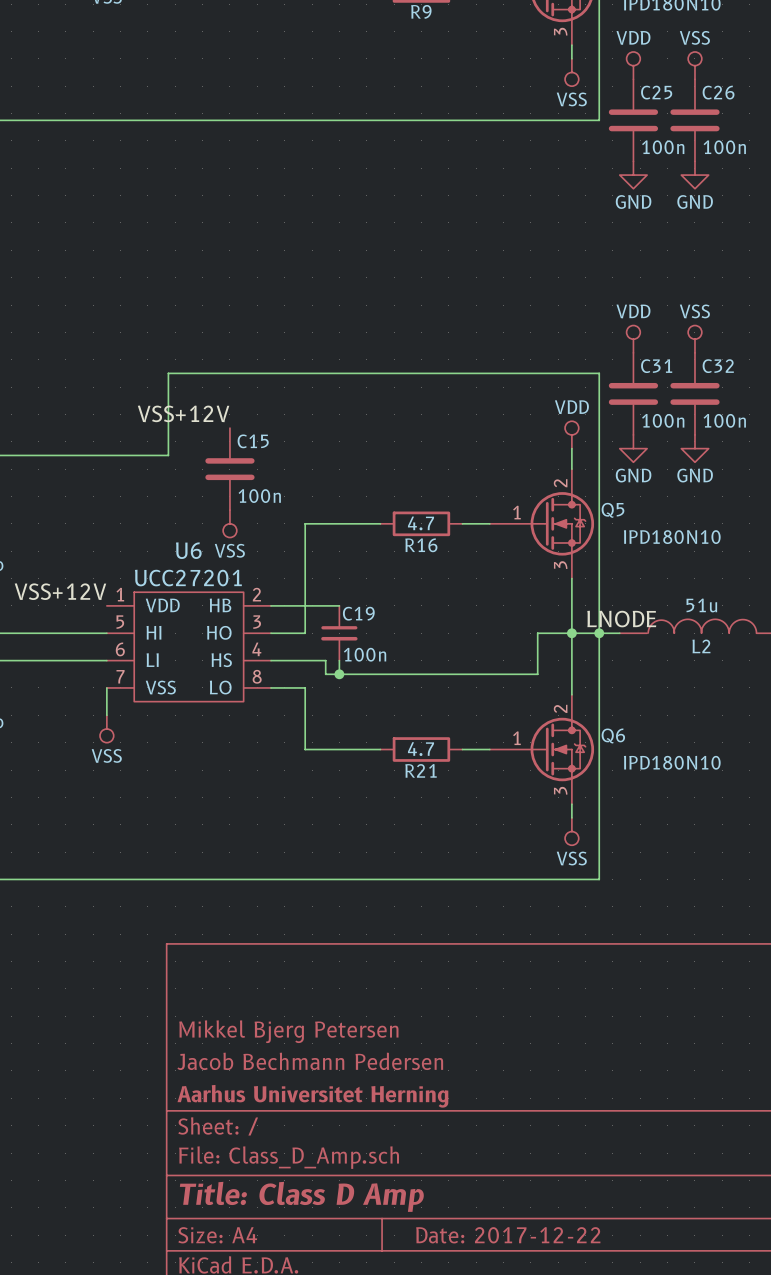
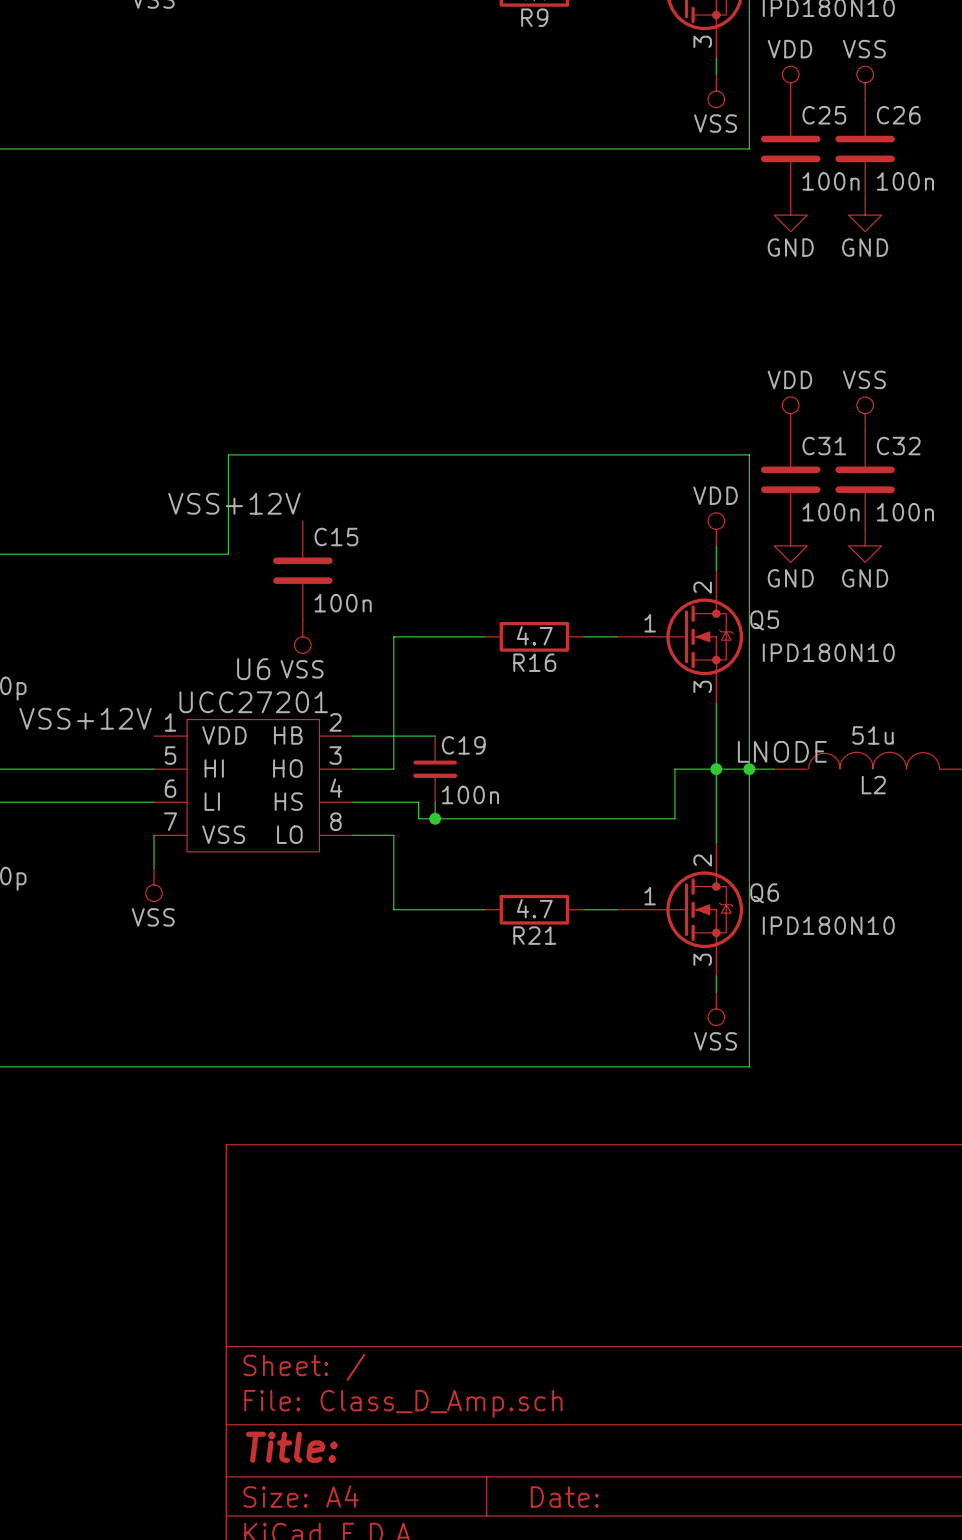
title block: Mikkel Bjerg Petersen (288, 1031) -> none
title block: Jacob Bechmann Pedersen (310, 1061) -> none
title block: Aarhus Universitet Herning (312, 1096) -> none
title block: Title: Class D Amp (301, 1196) -> Title: (291, 1447)
title block: Date: 2017-12-22 (508, 1235) -> Date: (564, 1496)

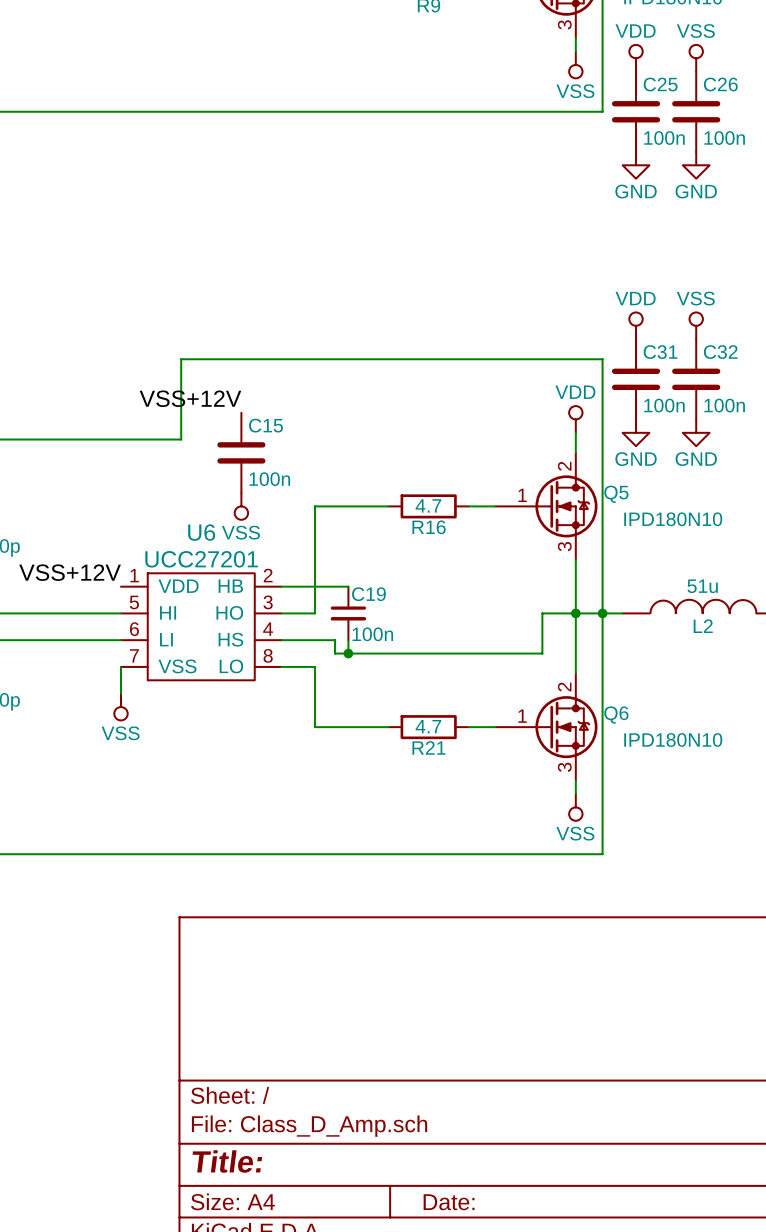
label: LNODE (782, 751) -> none

